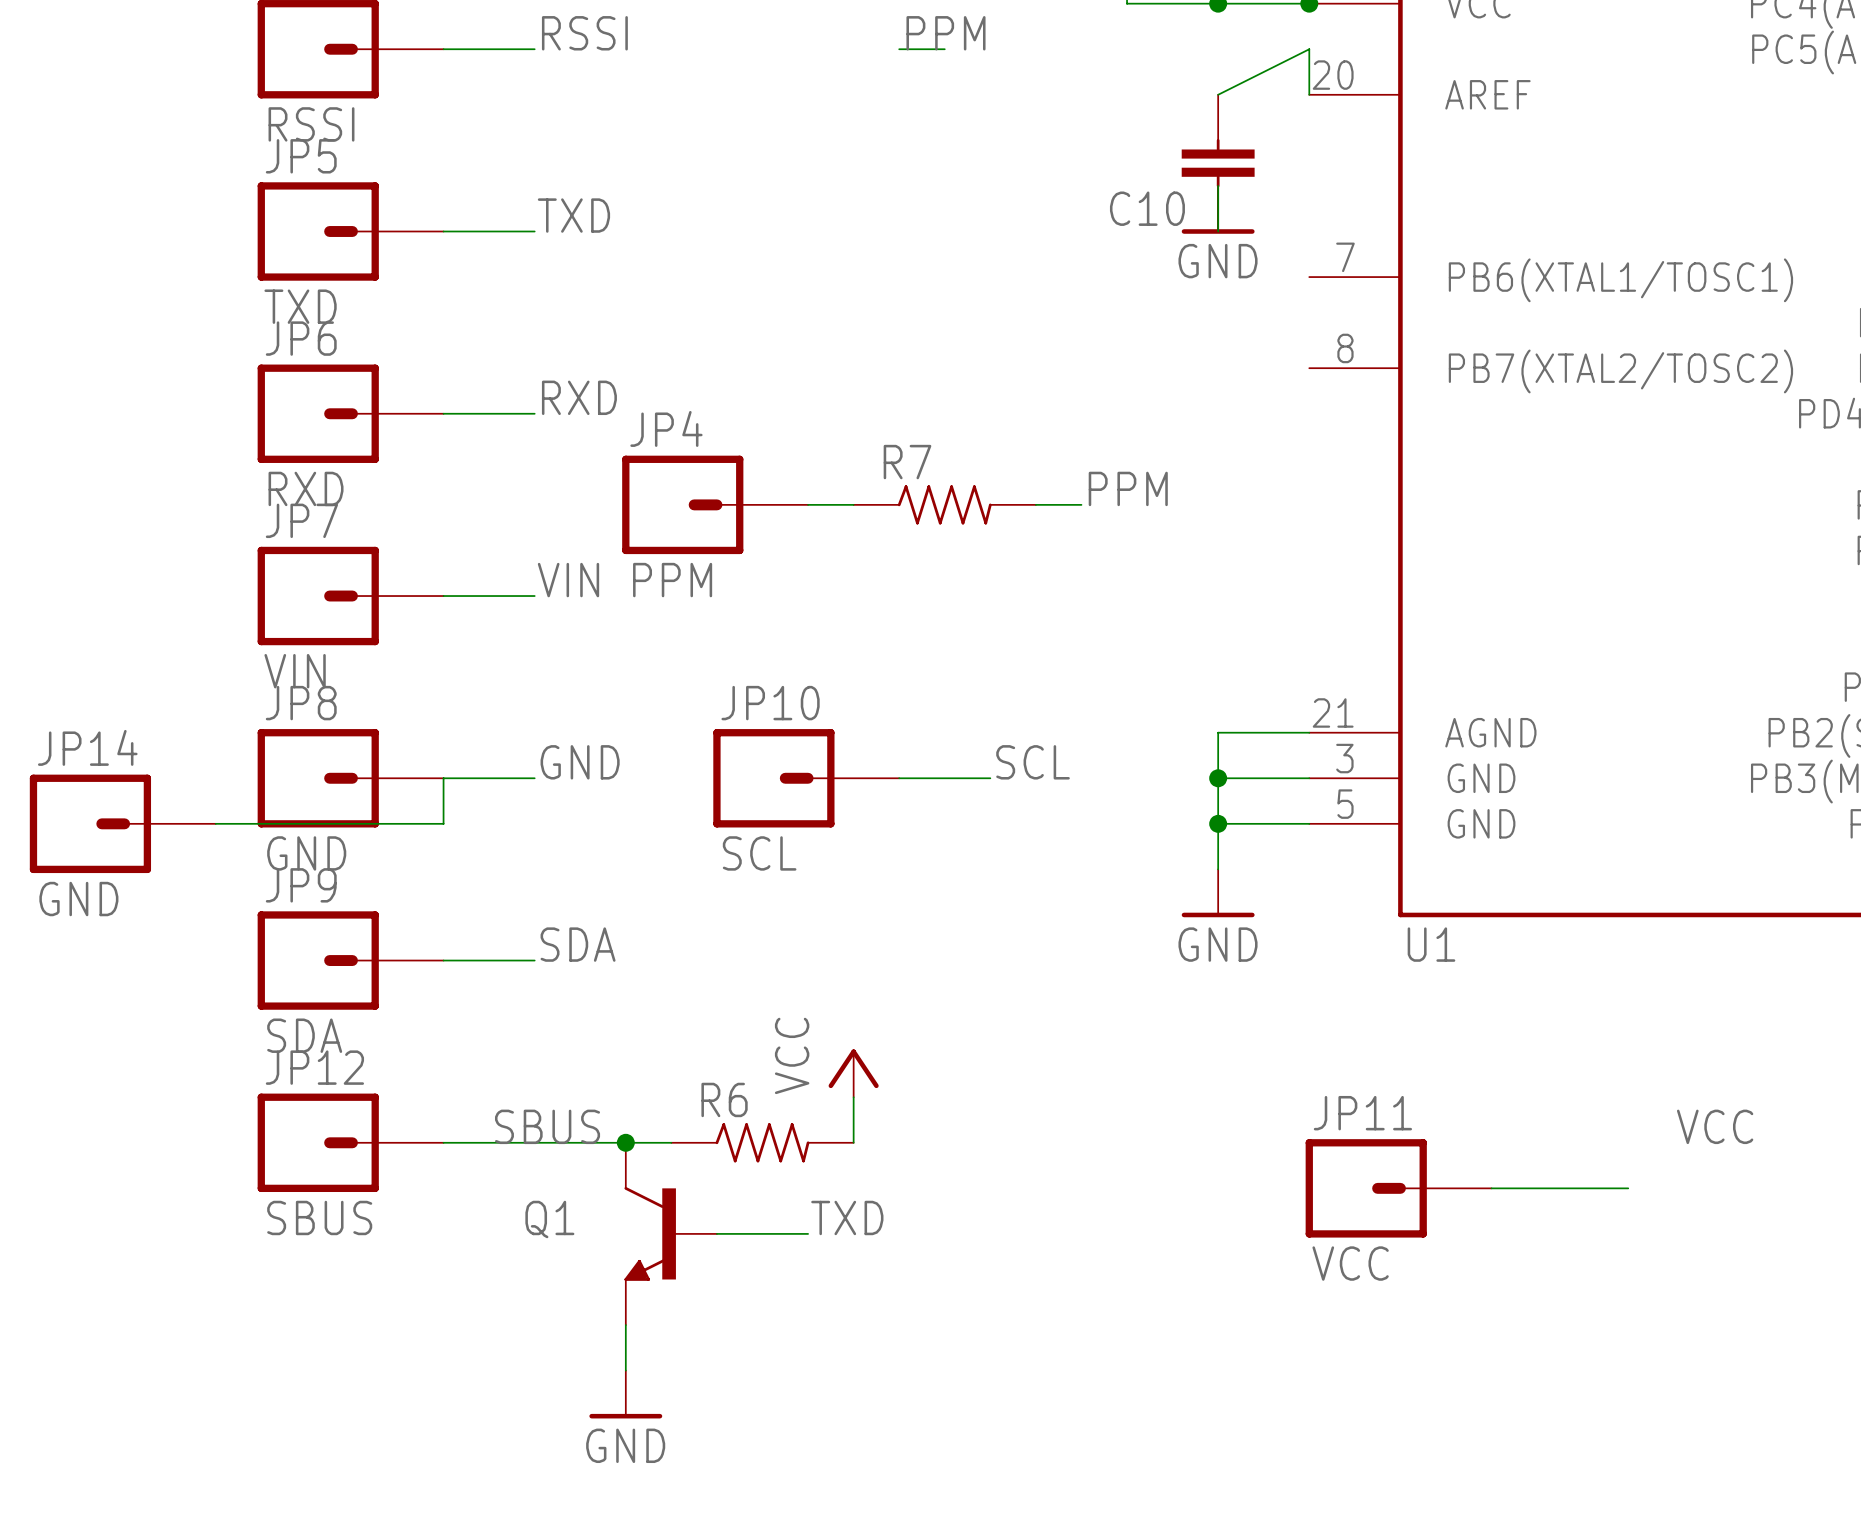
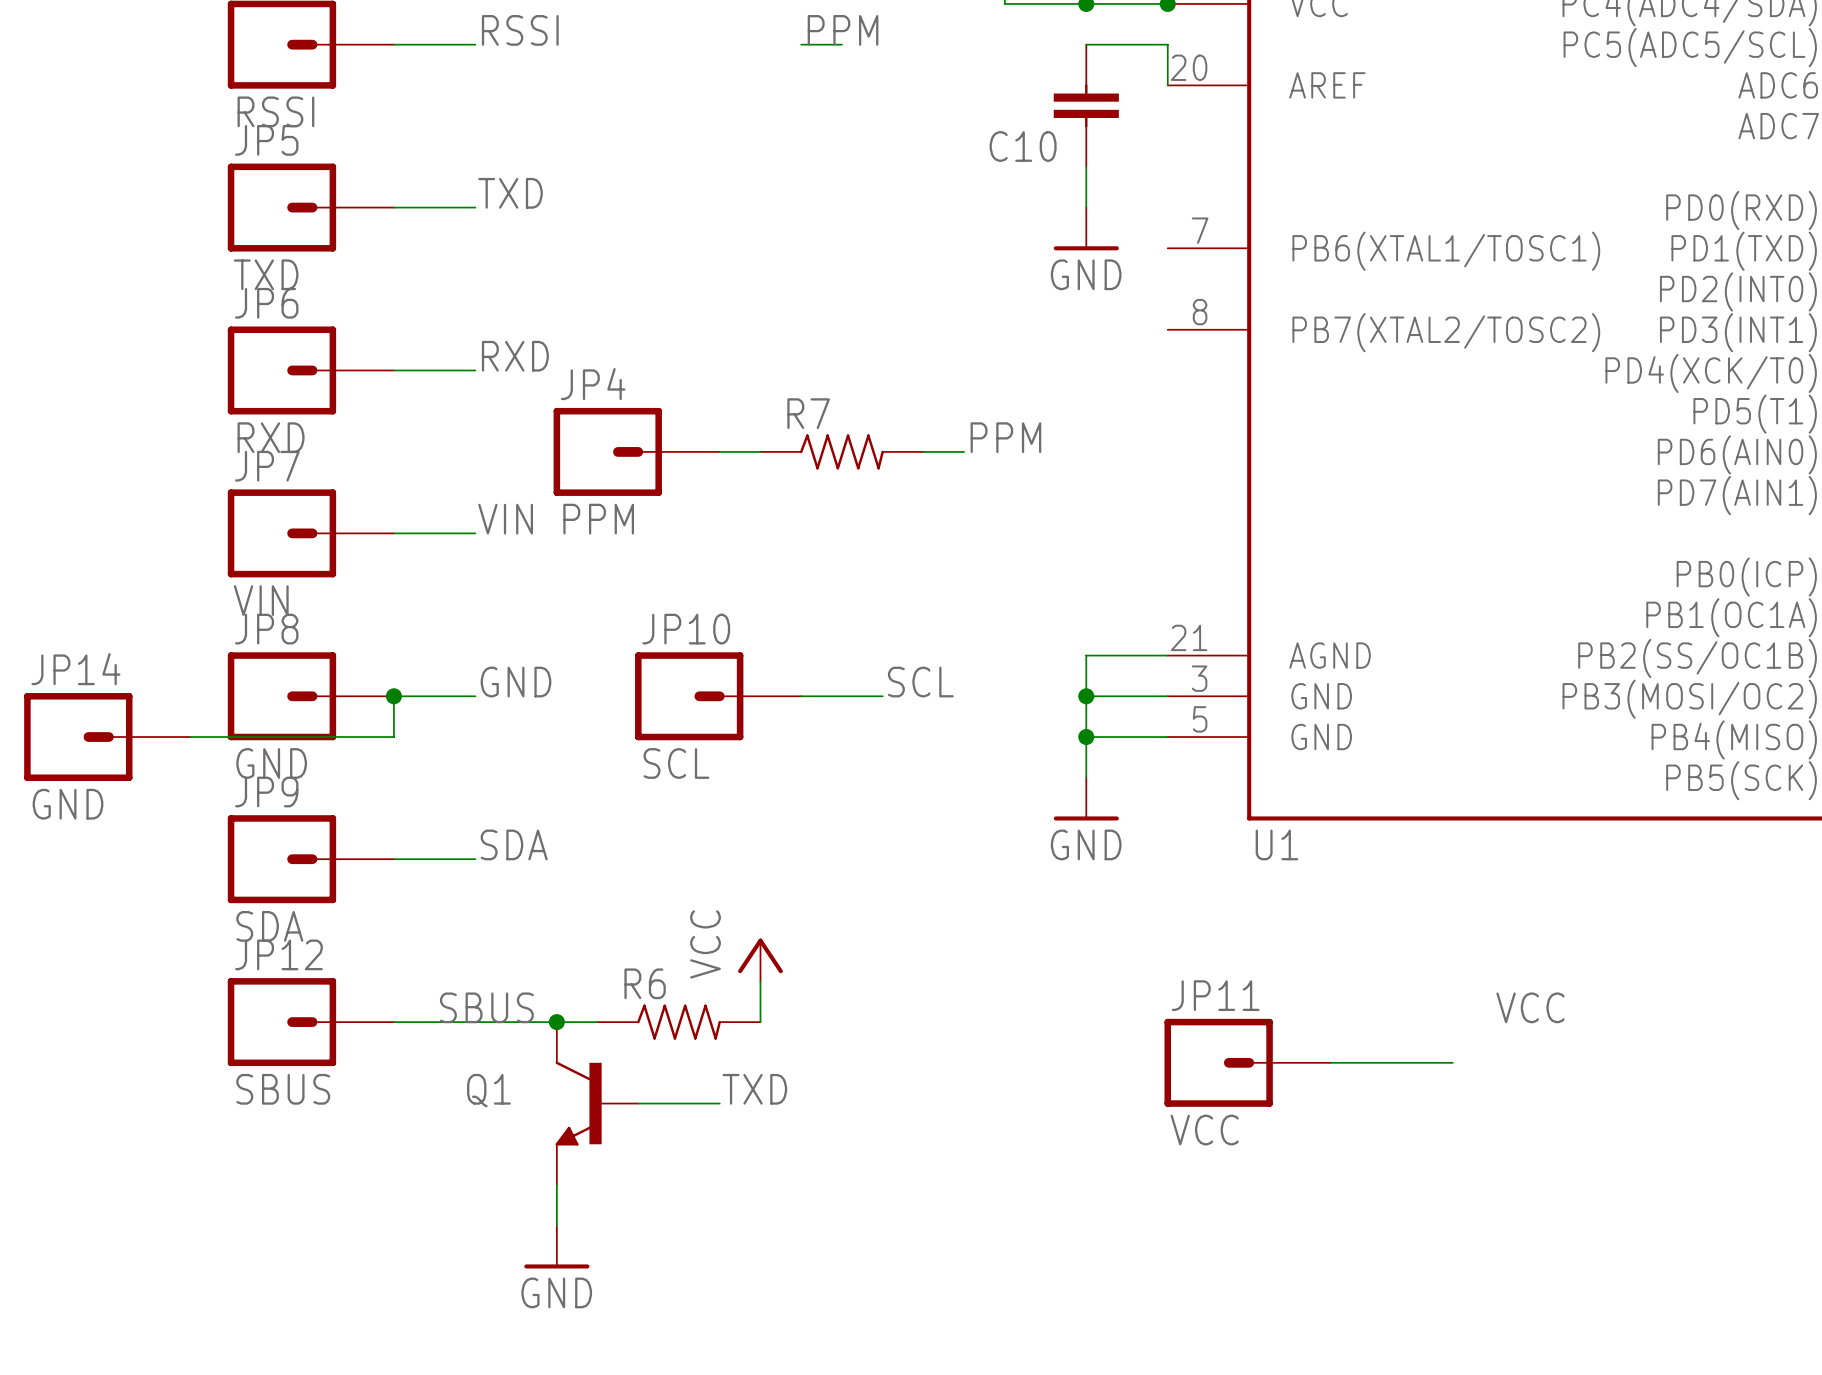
wire: (1309, 49) (1218, 94) -> (1167, 44) (1086, 44)
C10 position: (1218, 163) -> (1086, 105)
power symbol position: GND (1218, 209) -> GND (1086, 228)
junction: none -> (393, 696)

